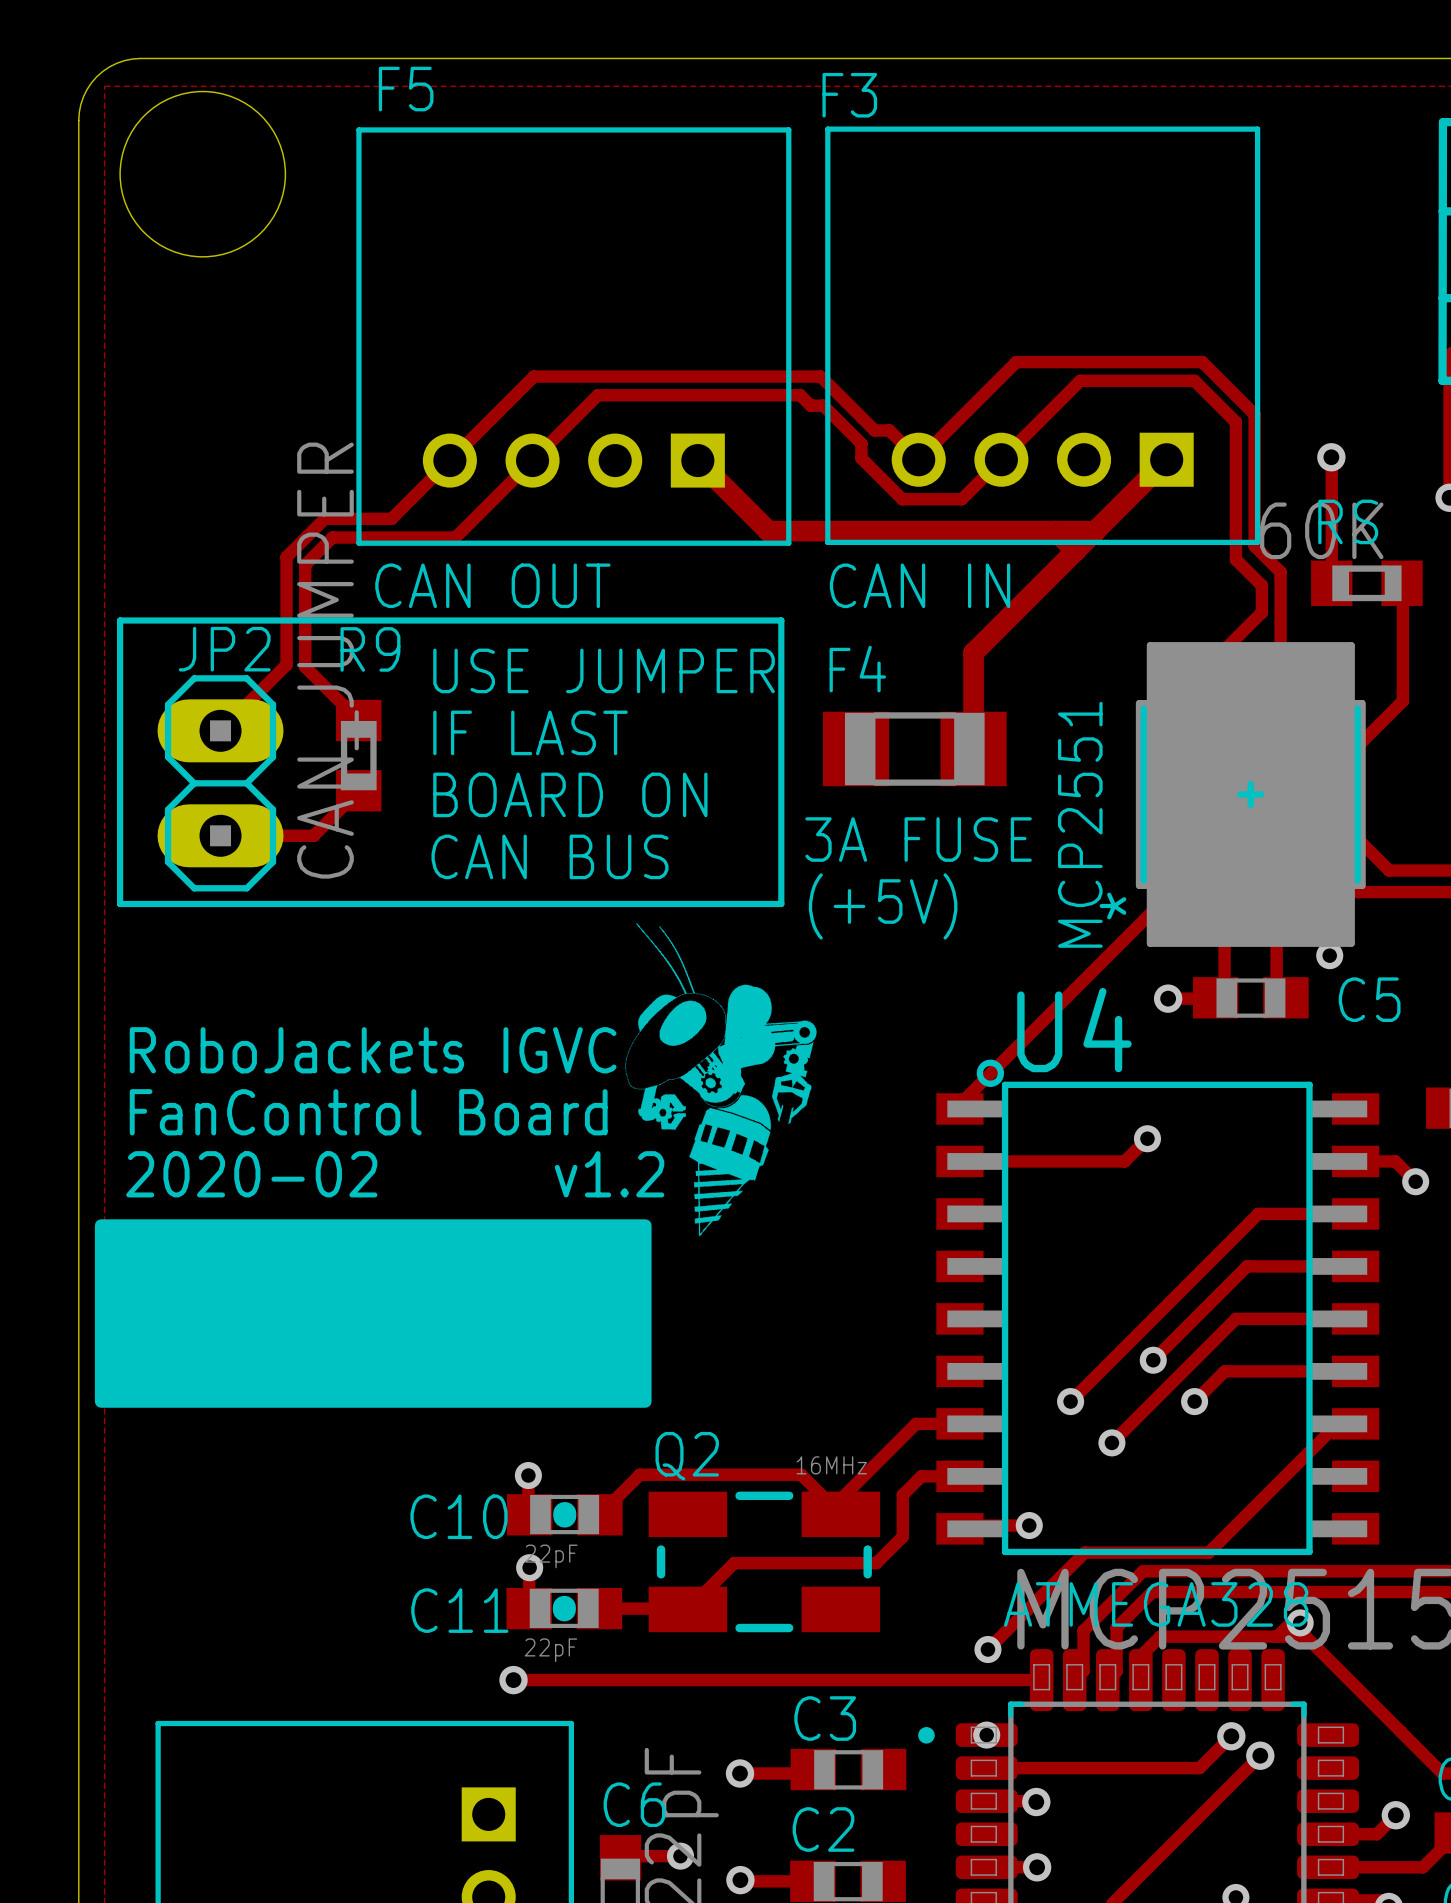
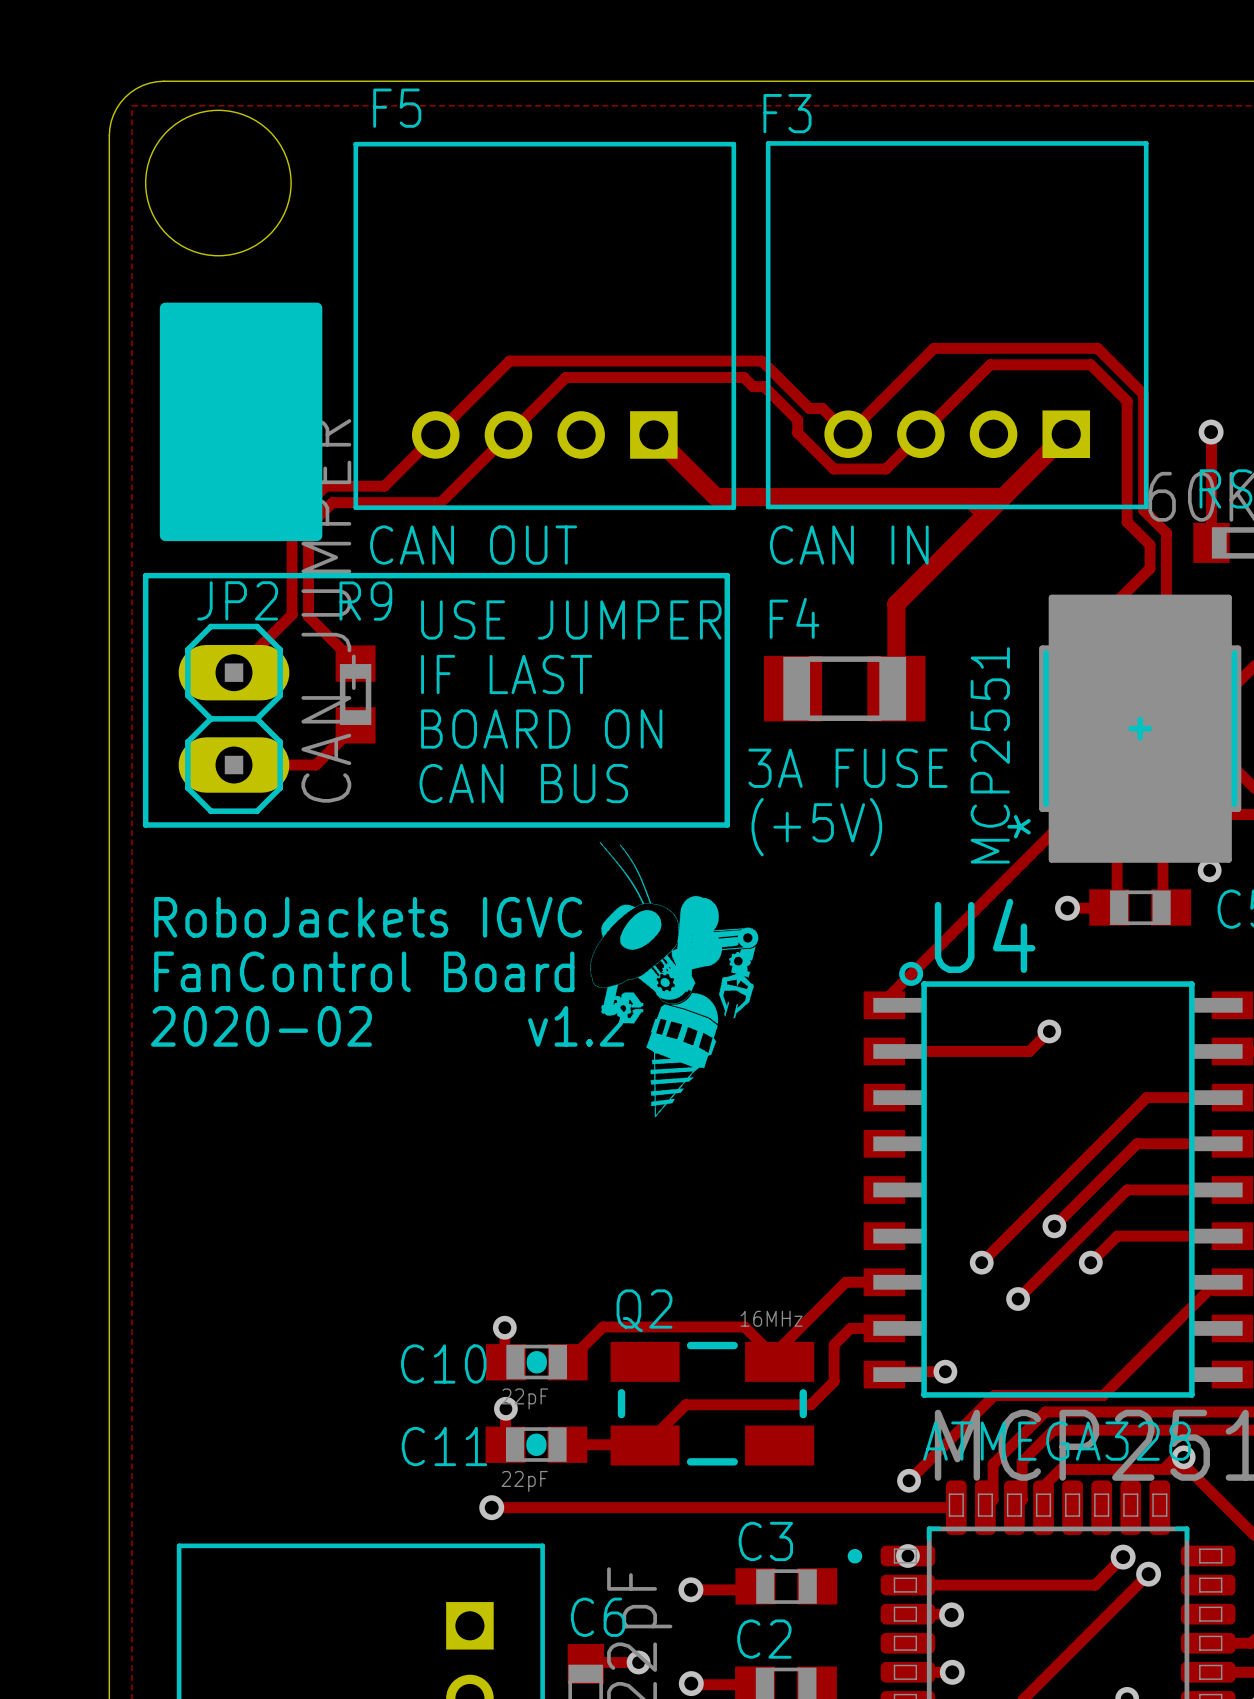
drawing: none -> [159, 302, 323, 542]
text position: RoboJackets IGVC (373, 1050) -> RoboJackets IGVC (368, 917)
text position: FanControl Board (368, 1112) -> FanControl Board (364, 971)
text position: 2020-02 v1.2 (395, 1174) -> 2020-02 v1.2 (387, 1026)
drawing: [94, 1219, 652, 1408] -> none

